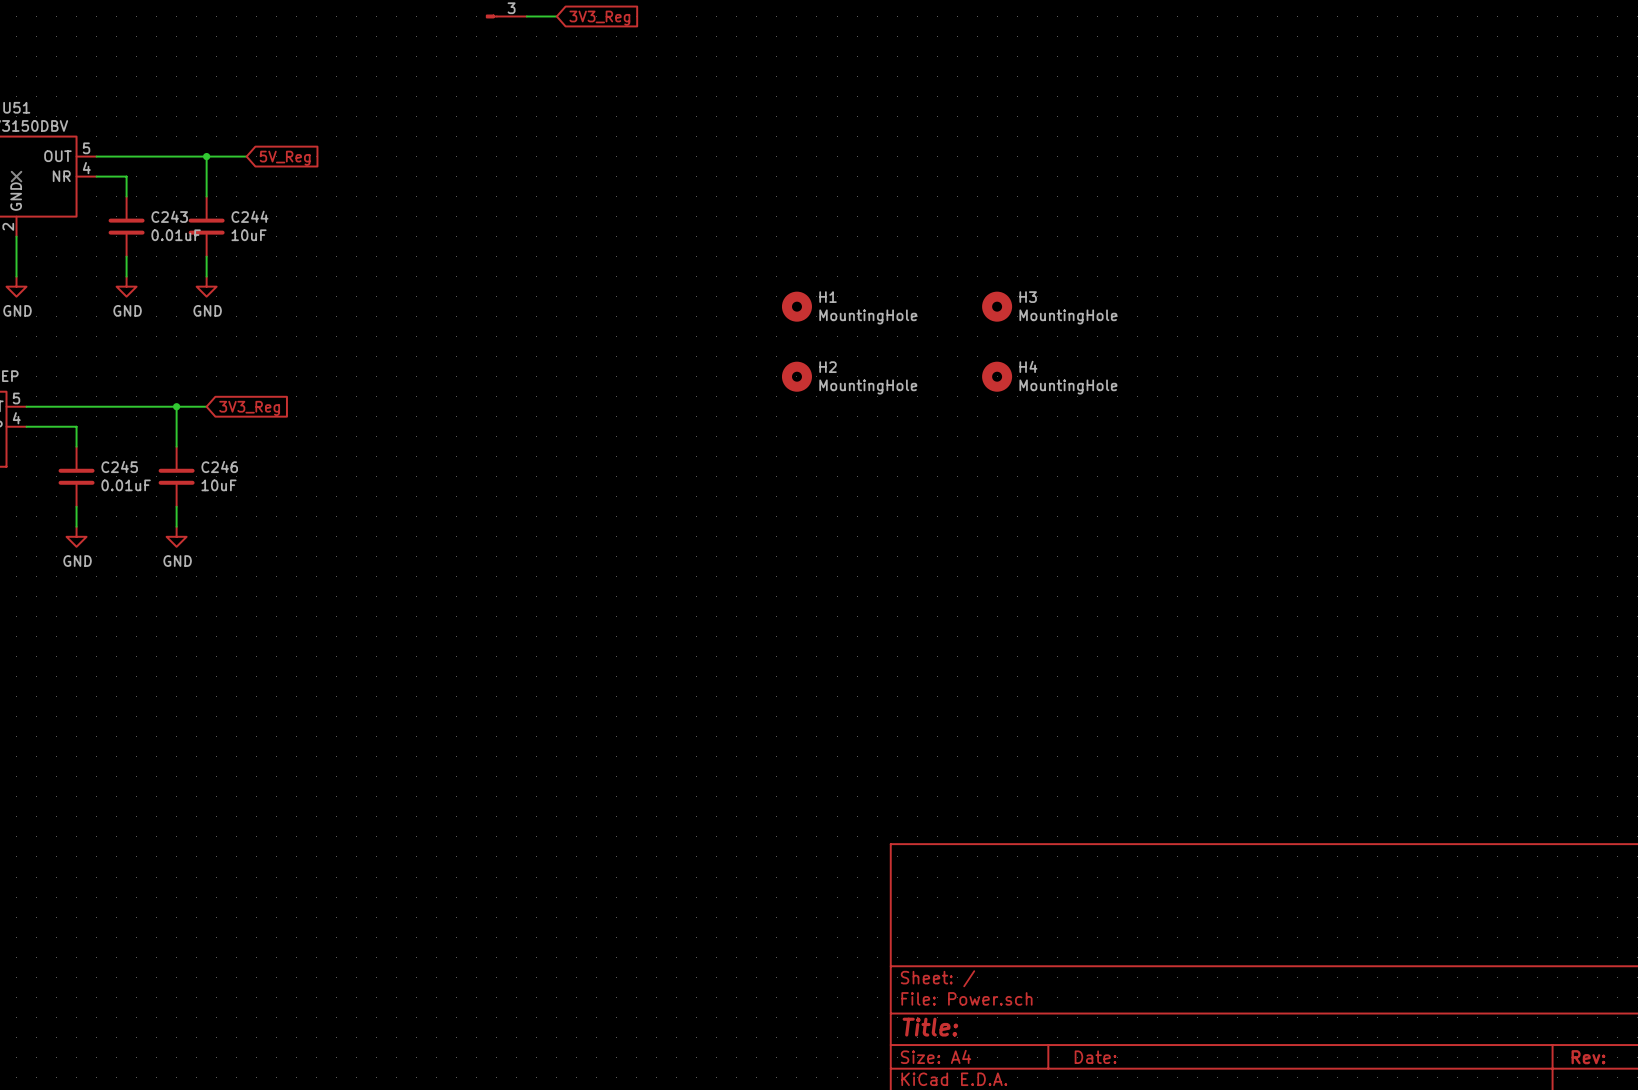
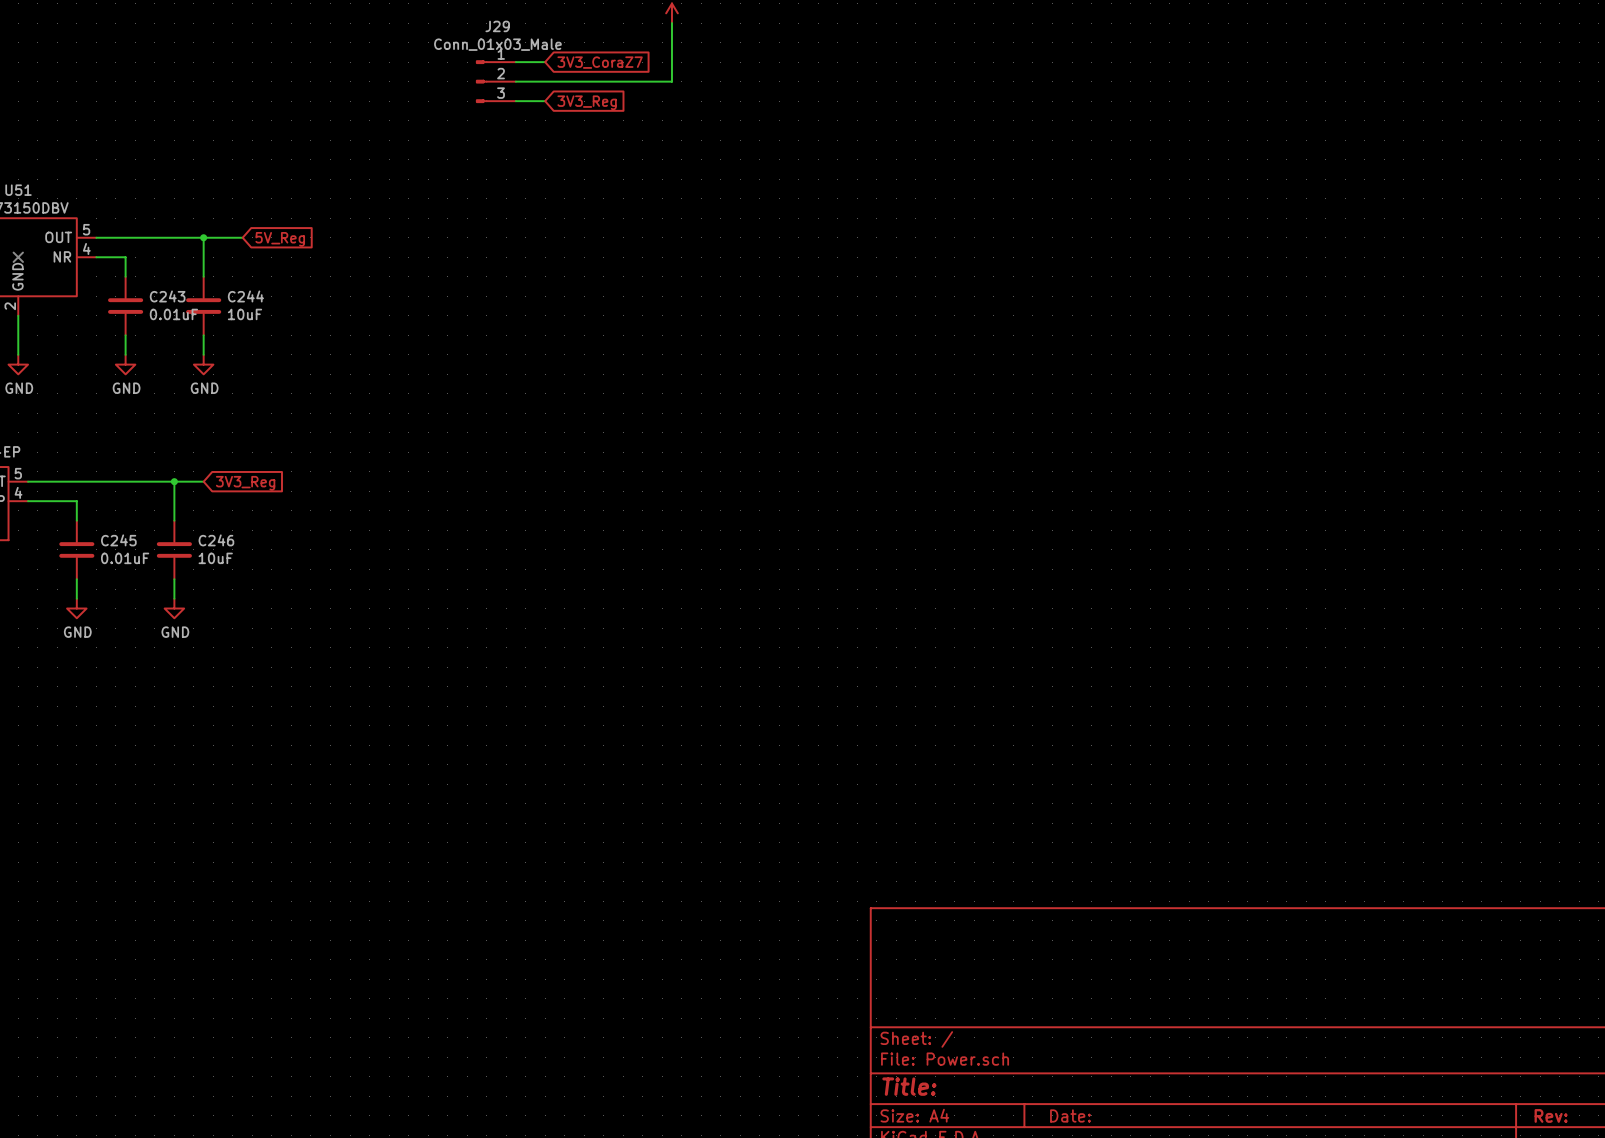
H1: MountingHole (796, 306) -> none
H3: MountingHole (997, 306) -> none
H2: MountingHole (796, 376) -> none
H4: MountingHole (997, 376) -> none

